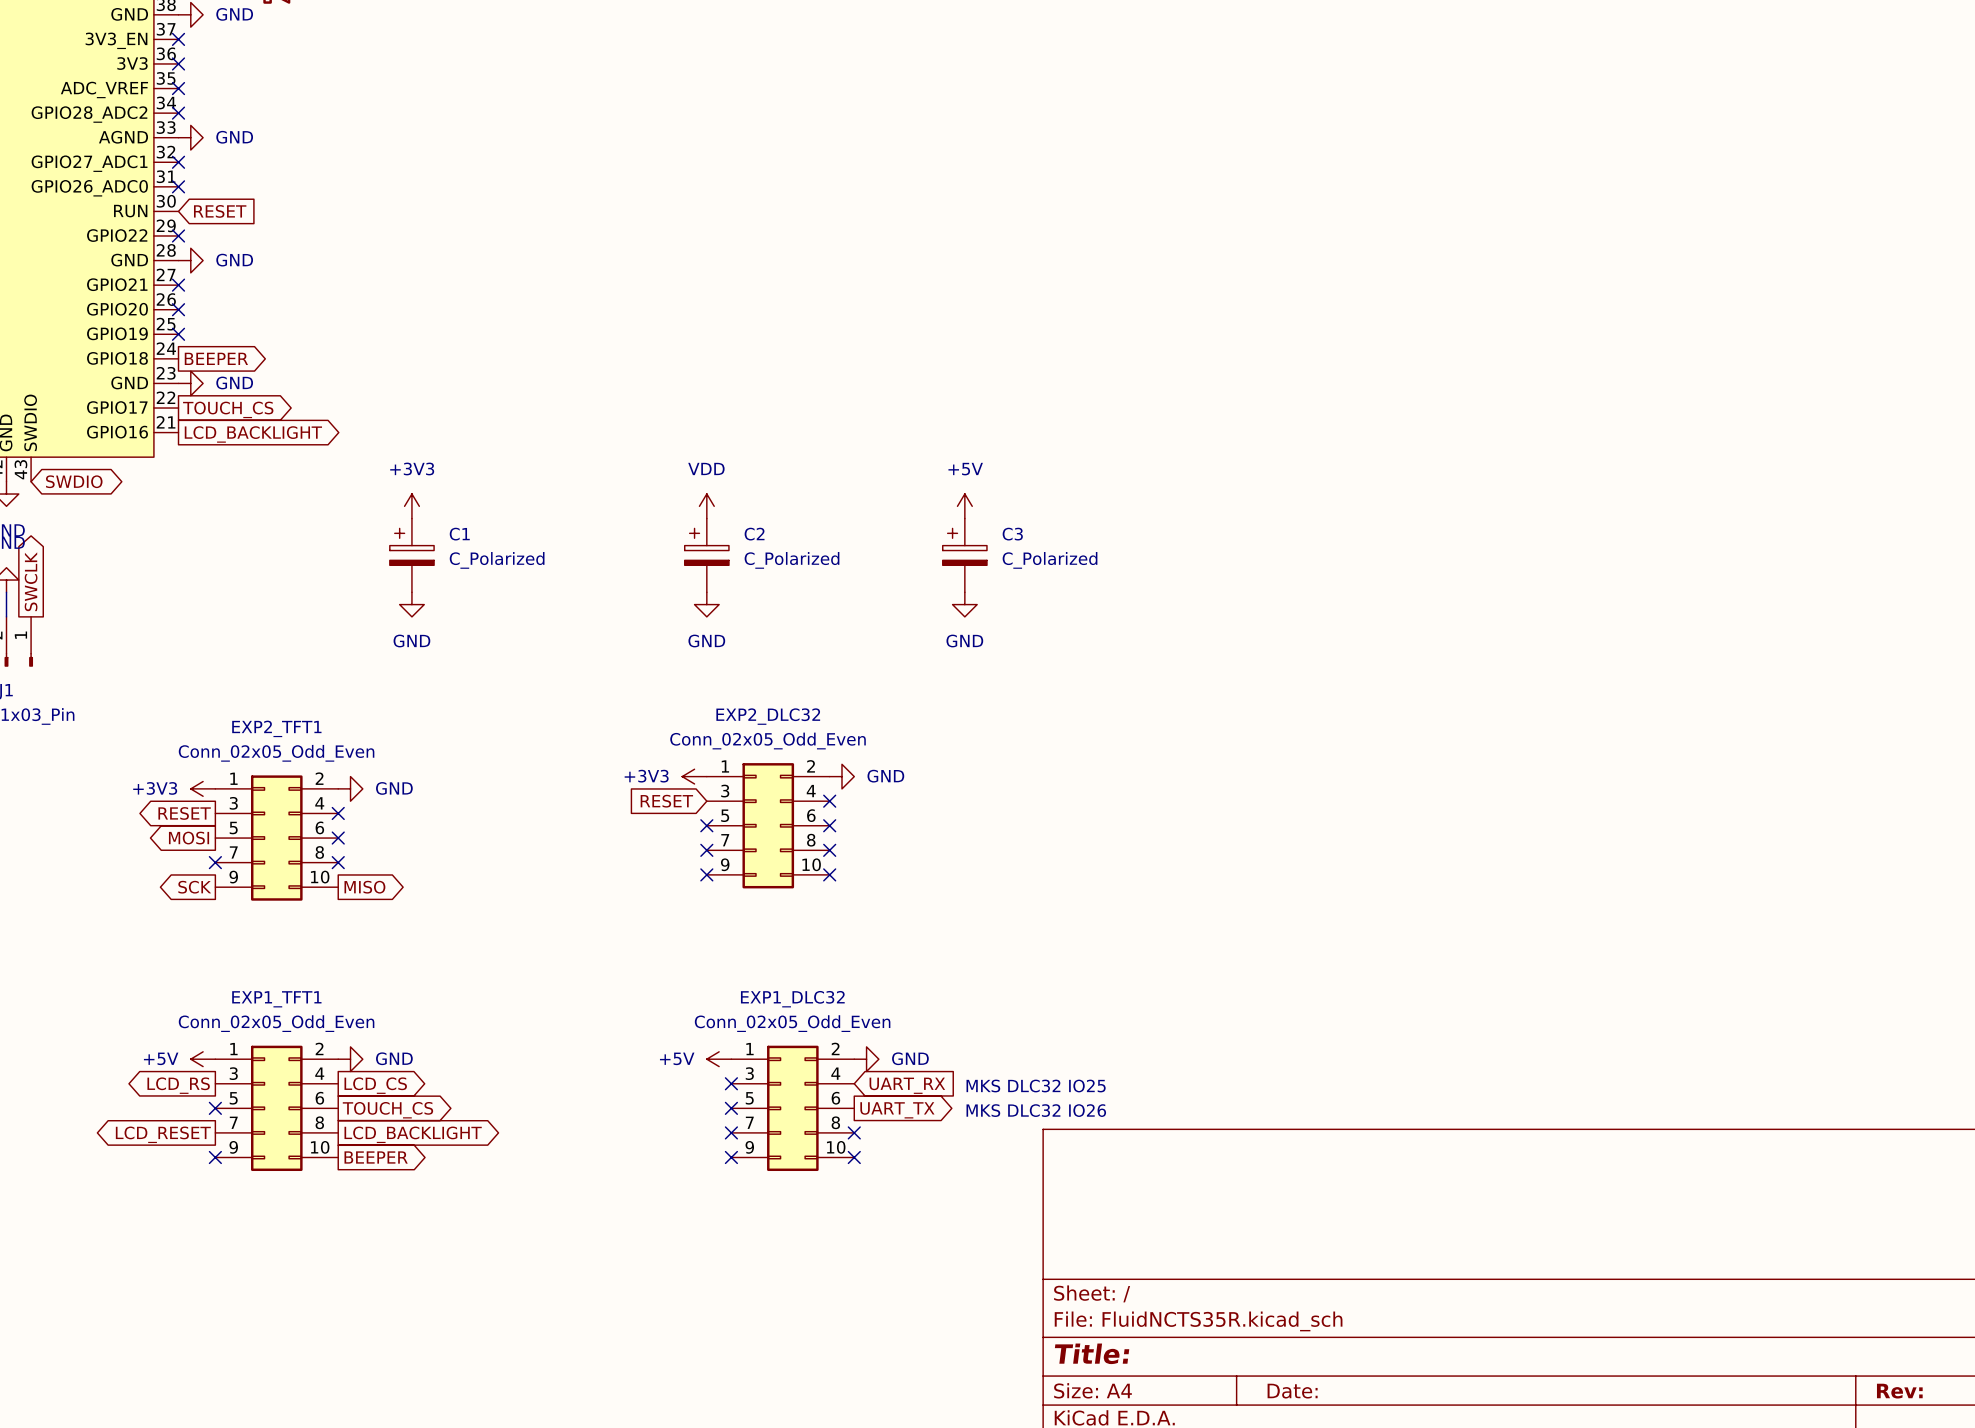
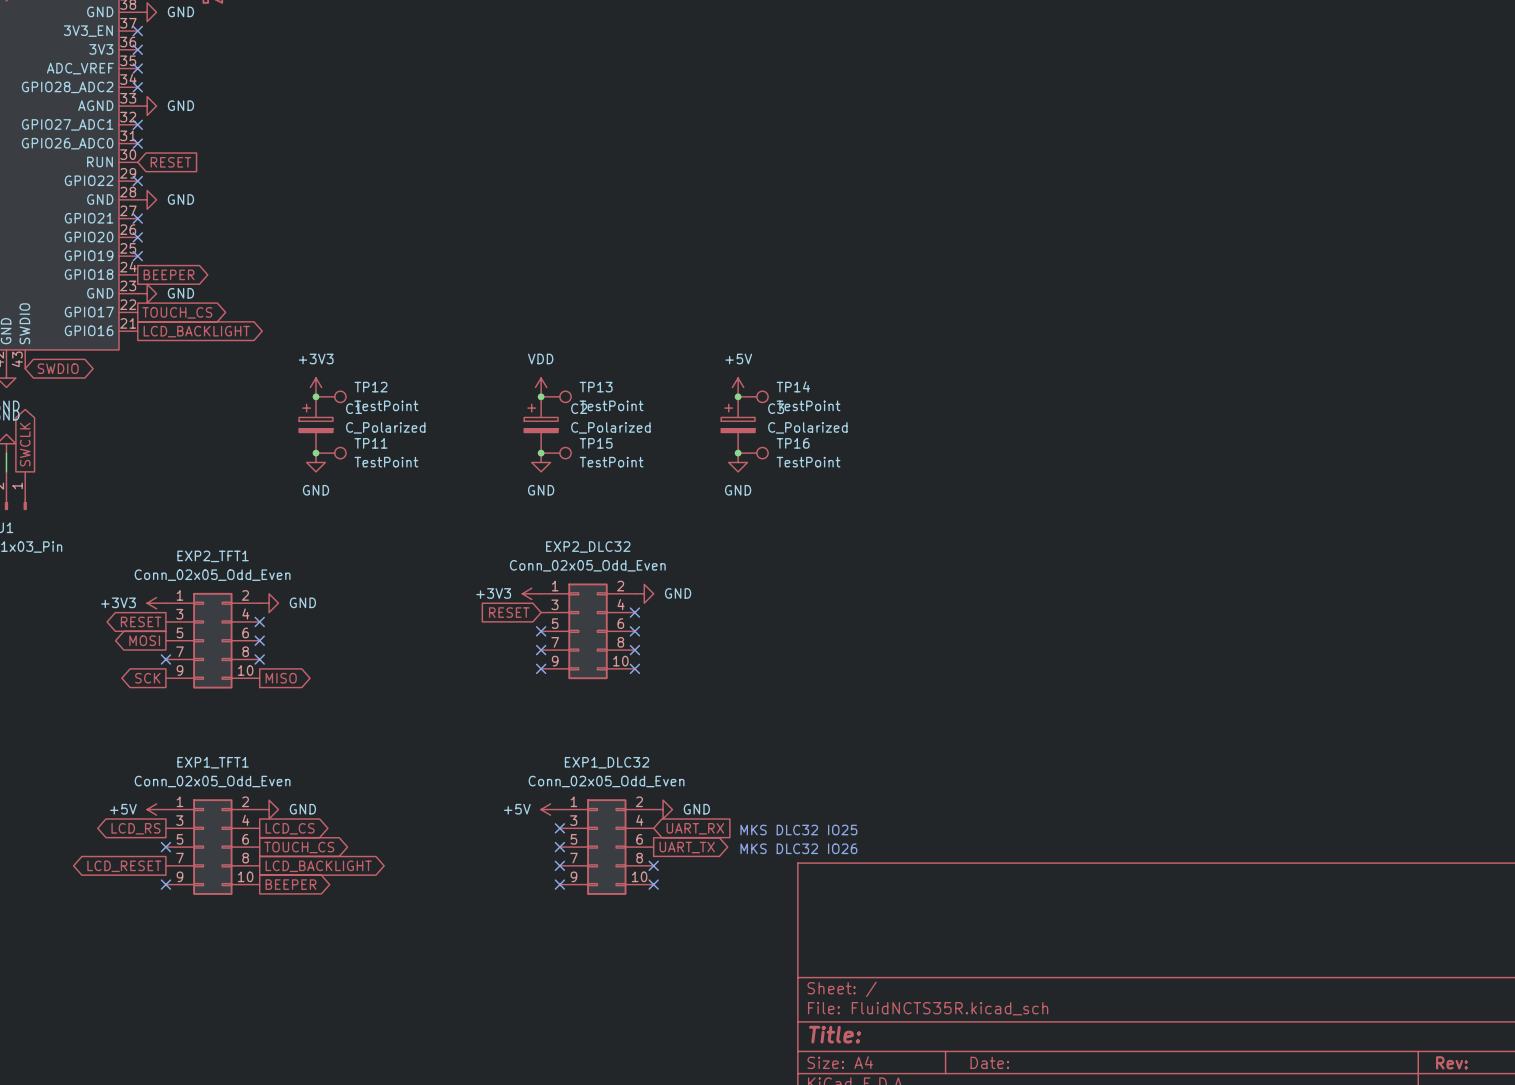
junction: none -> (316, 396)
TP12: none -> TestPoint (331, 396)
junction: none -> (541, 396)
TP13: none -> TestPoint (556, 396)
junction: none -> (738, 396)
TP14: none -> TestPoint (753, 396)
junction: none -> (316, 453)
TP11: none -> TestPoint (331, 453)
junction: none -> (541, 453)
TP15: none -> TestPoint (556, 453)
junction: none -> (738, 453)
TP16: none -> TestPoint (753, 453)

